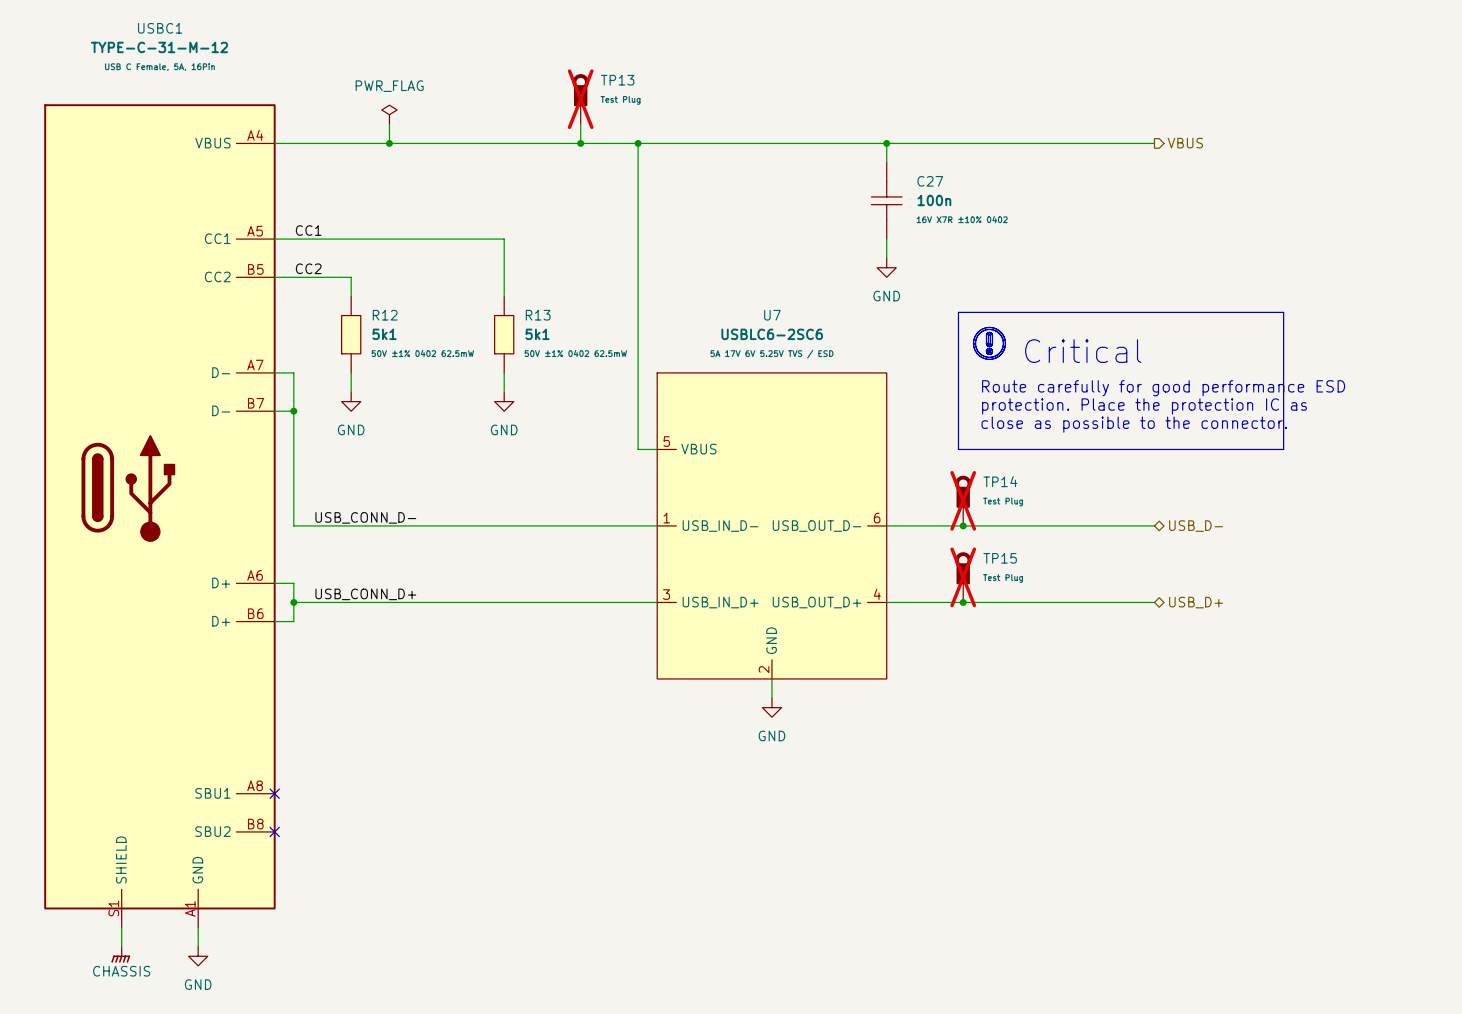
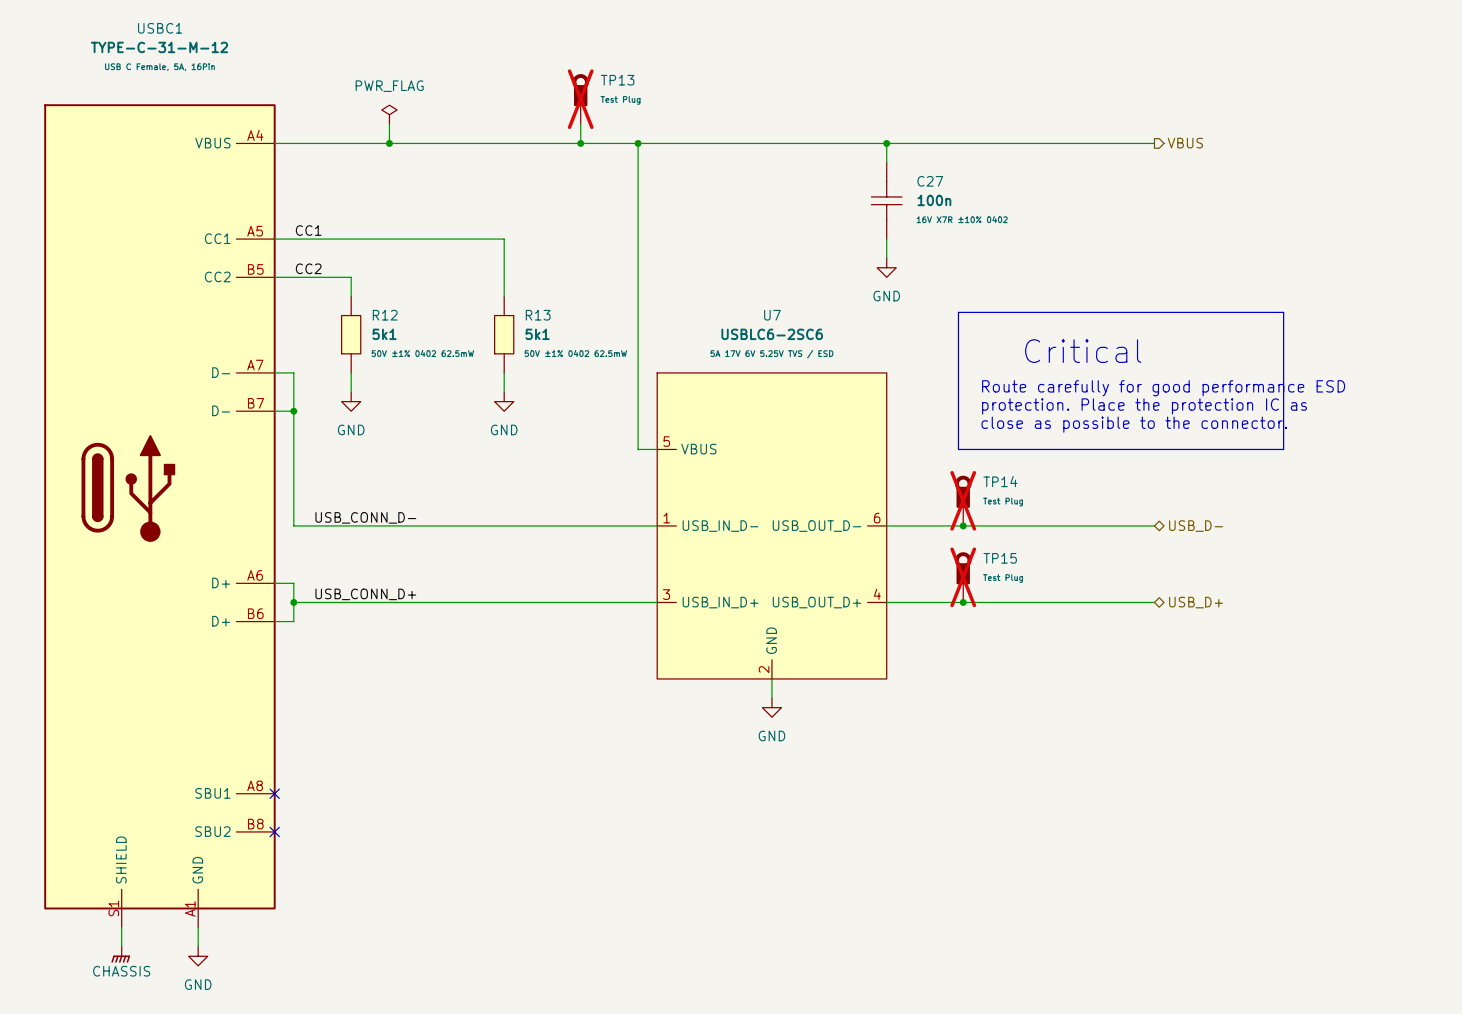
line: (989, 327) (977, 332) (973, 343) (978, 354) (989, 359) (1000, 354) (1005, 343) (1000, 332) (989, 327) -> none
line: (986, 335) (986, 343) -> none
line: (988, 335) (988, 343) (986, 343) -> none
line: (990, 335) (990, 343) -> none
line: (992, 335) (992, 343) -> none
line: (975, 343) (980, 353) (990, 357) (999, 352) (1003, 342) (998, 332) (988, 329) (979, 333) (975, 343) -> none
line: (986, 343) (990, 345) -> none
line: (989, 348) (986, 350) -> none
line: (992, 350) (990, 354) (986, 353) (988, 351) -> none

